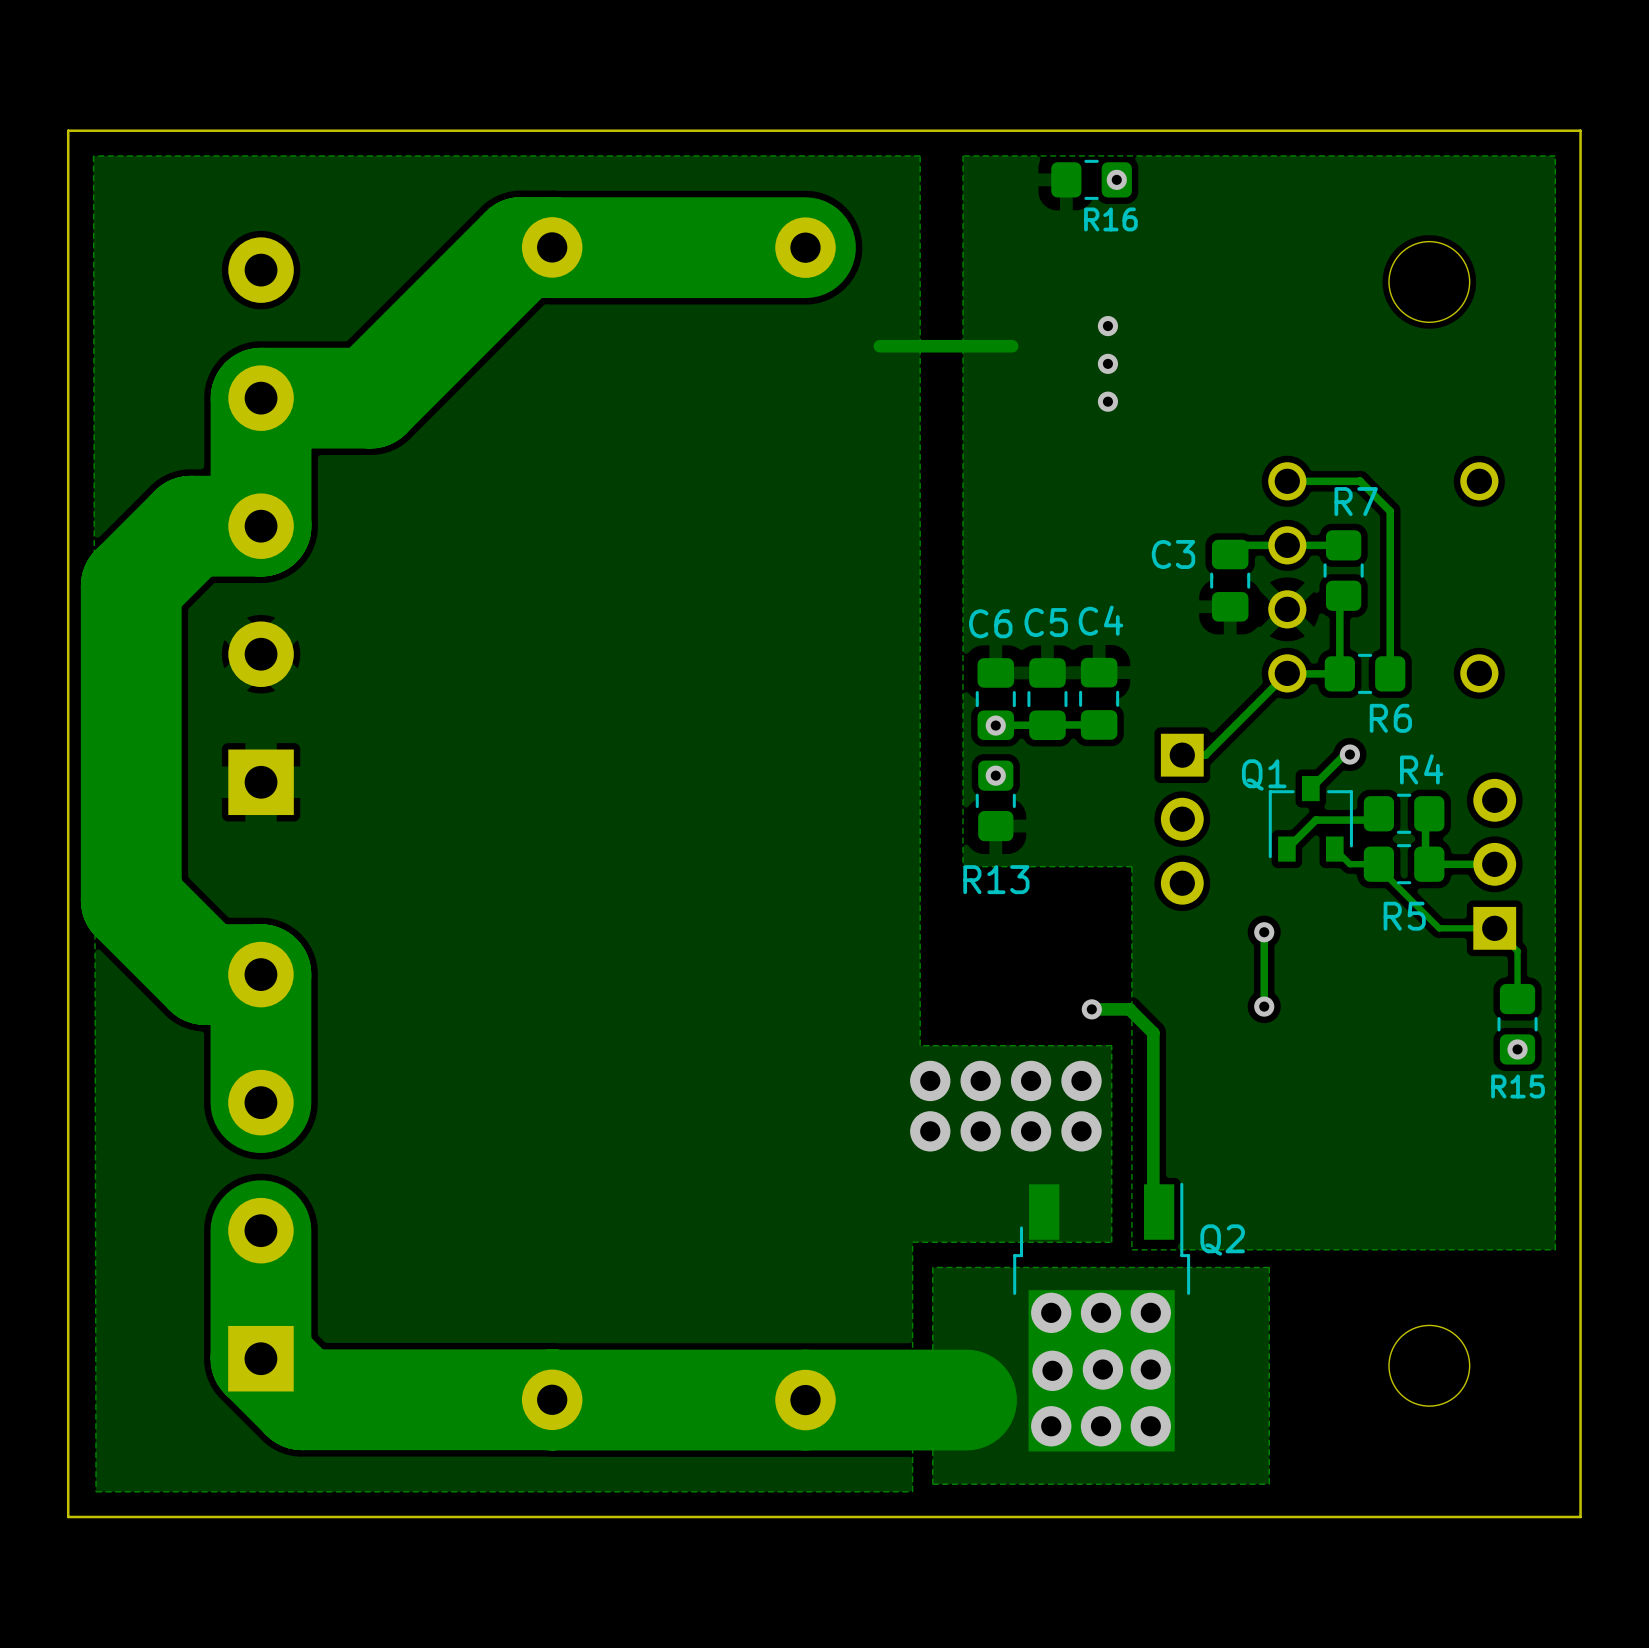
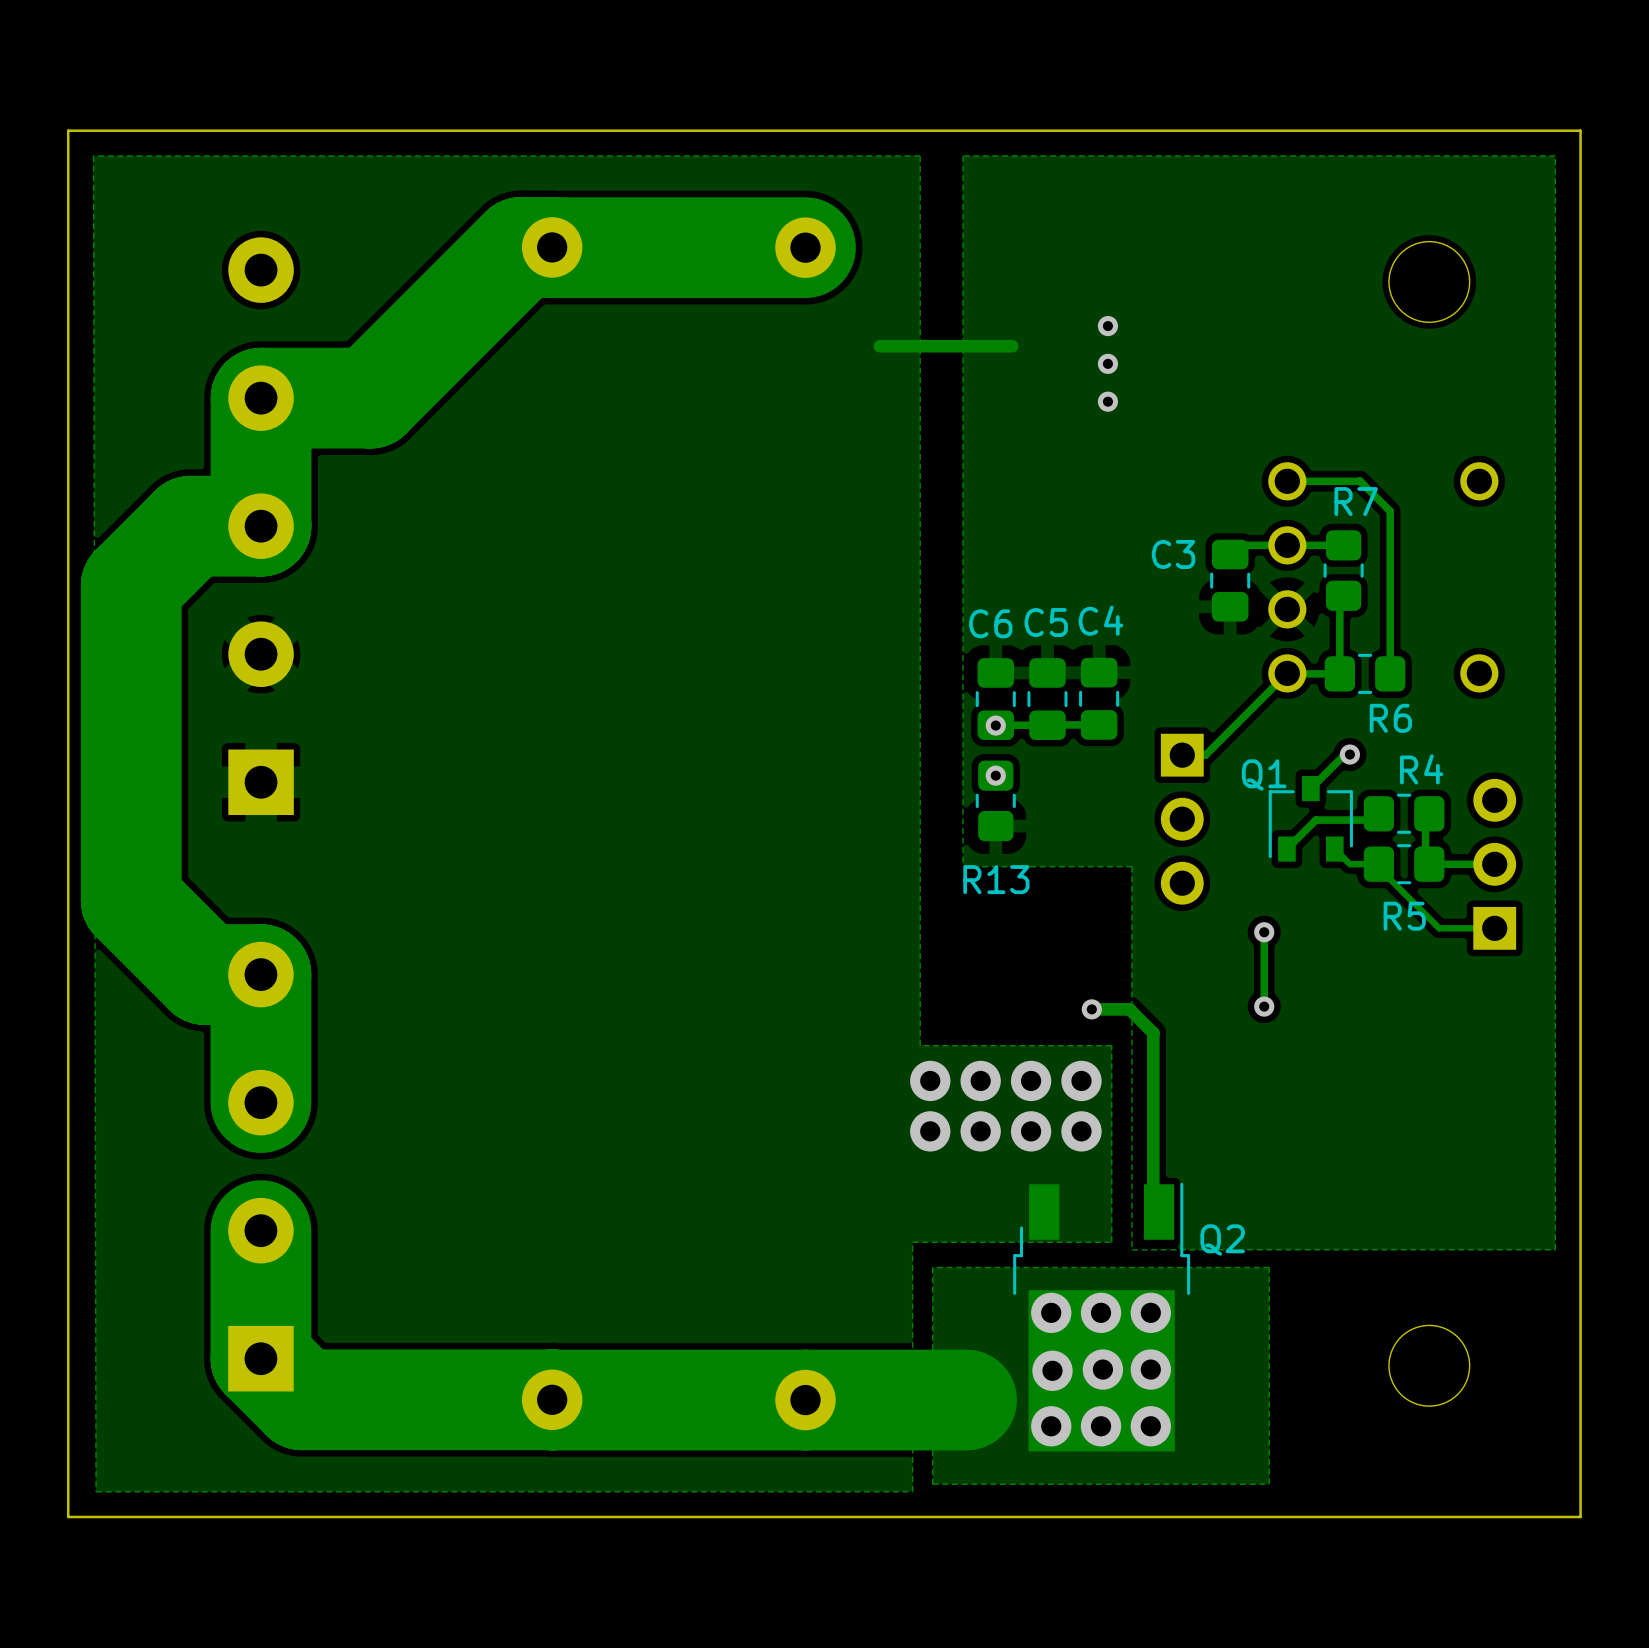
R16: (1091, 179) -> none
via: (1116, 179) -> none
track: (1494, 928) (1517, 951) (1517, 999) -> none
R15: (1517, 1024) -> none
via: (1517, 1049) -> none

